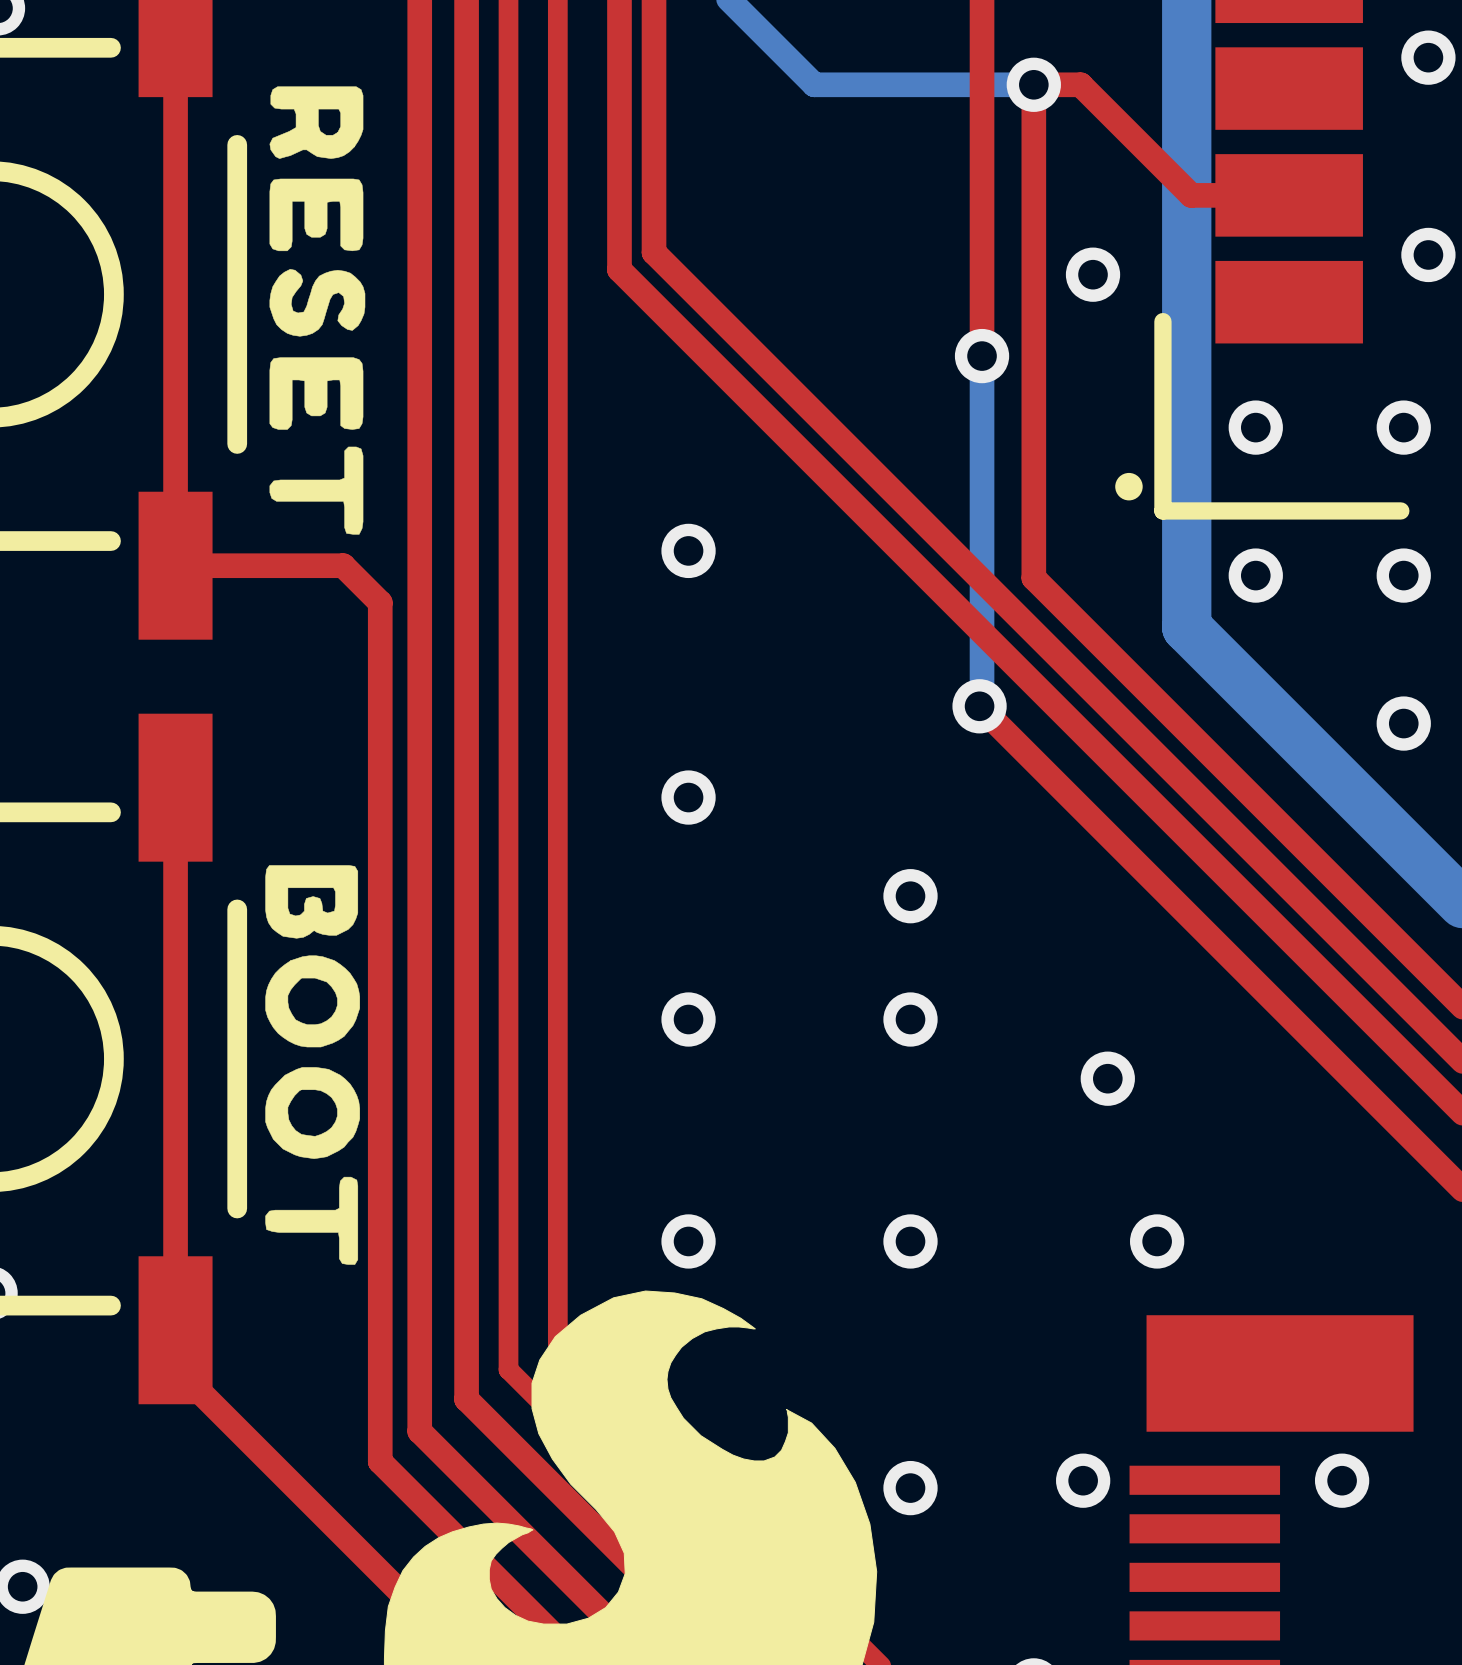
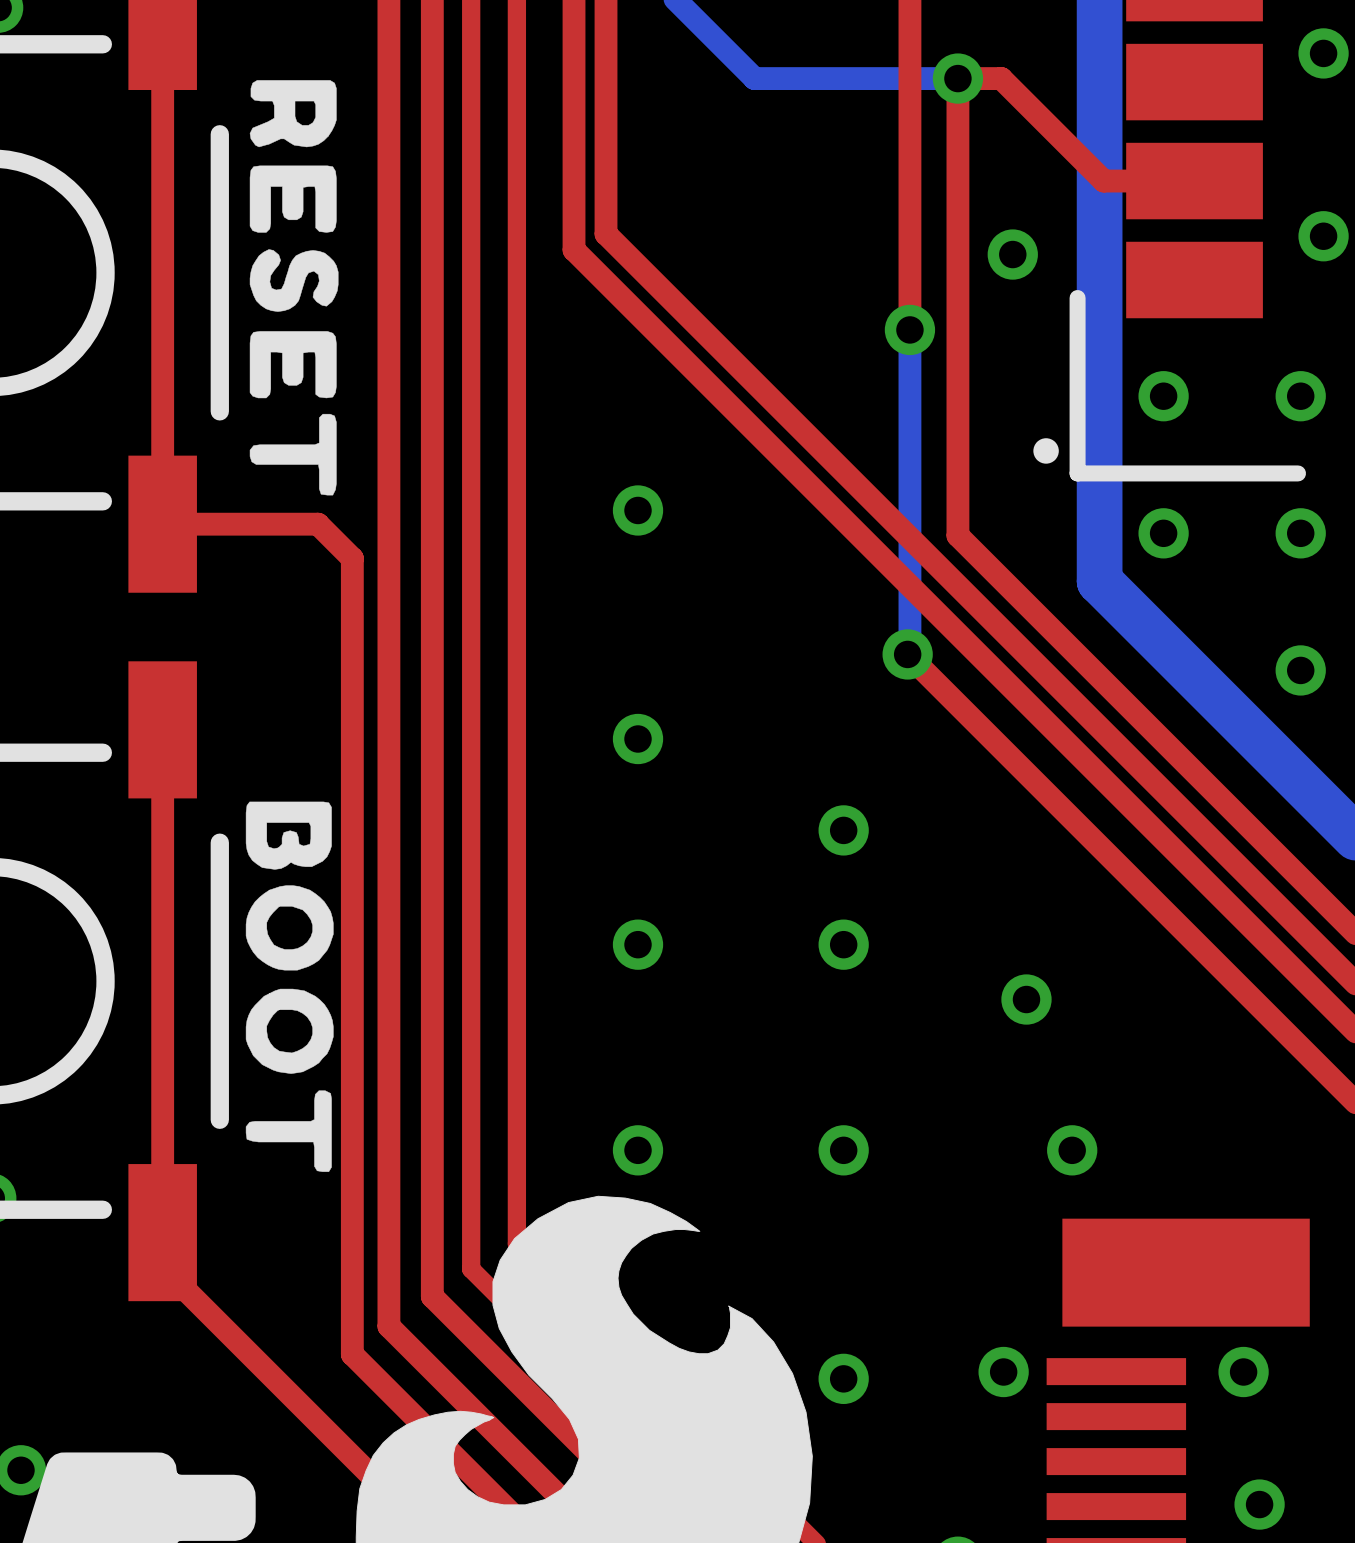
via: none -> (1259, 1504)

